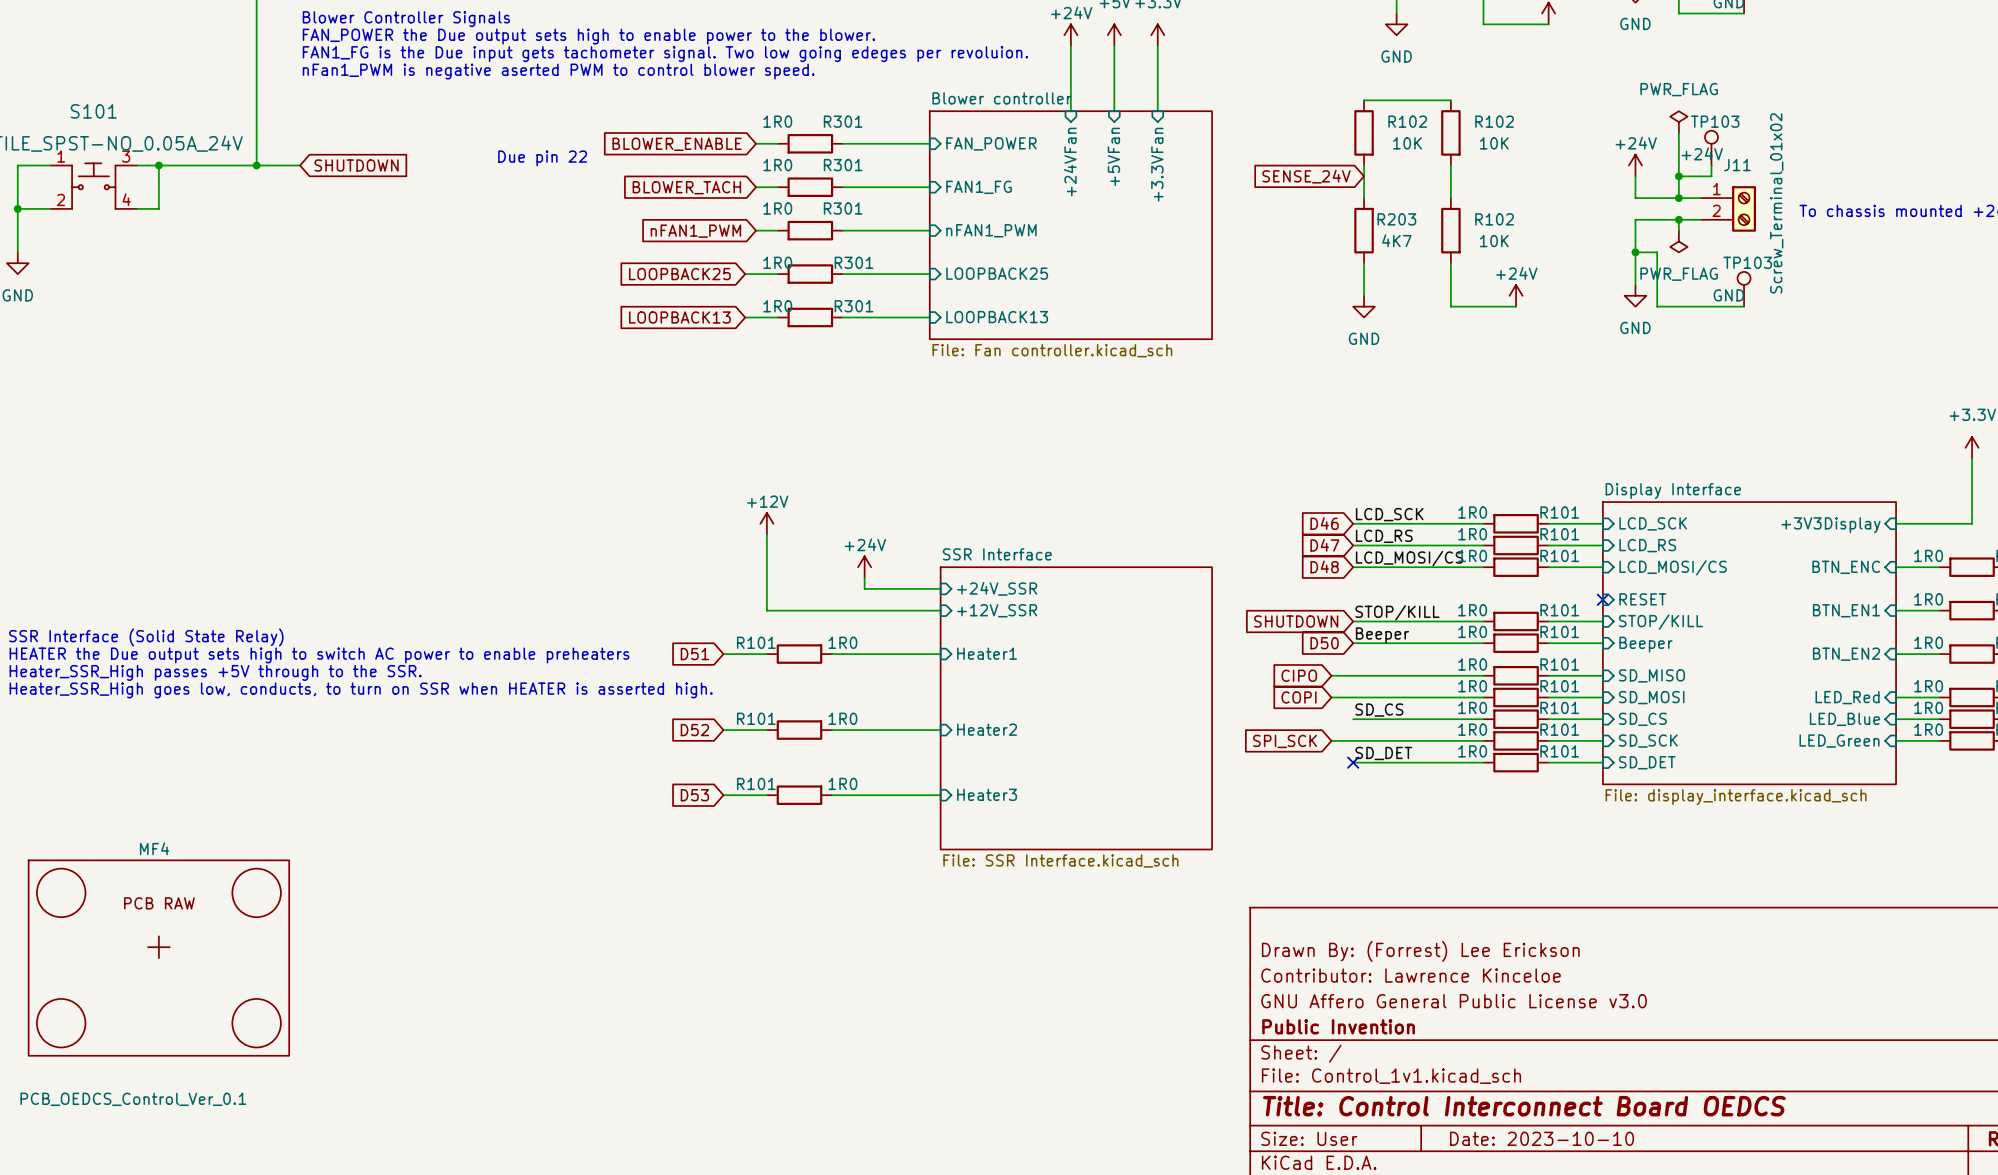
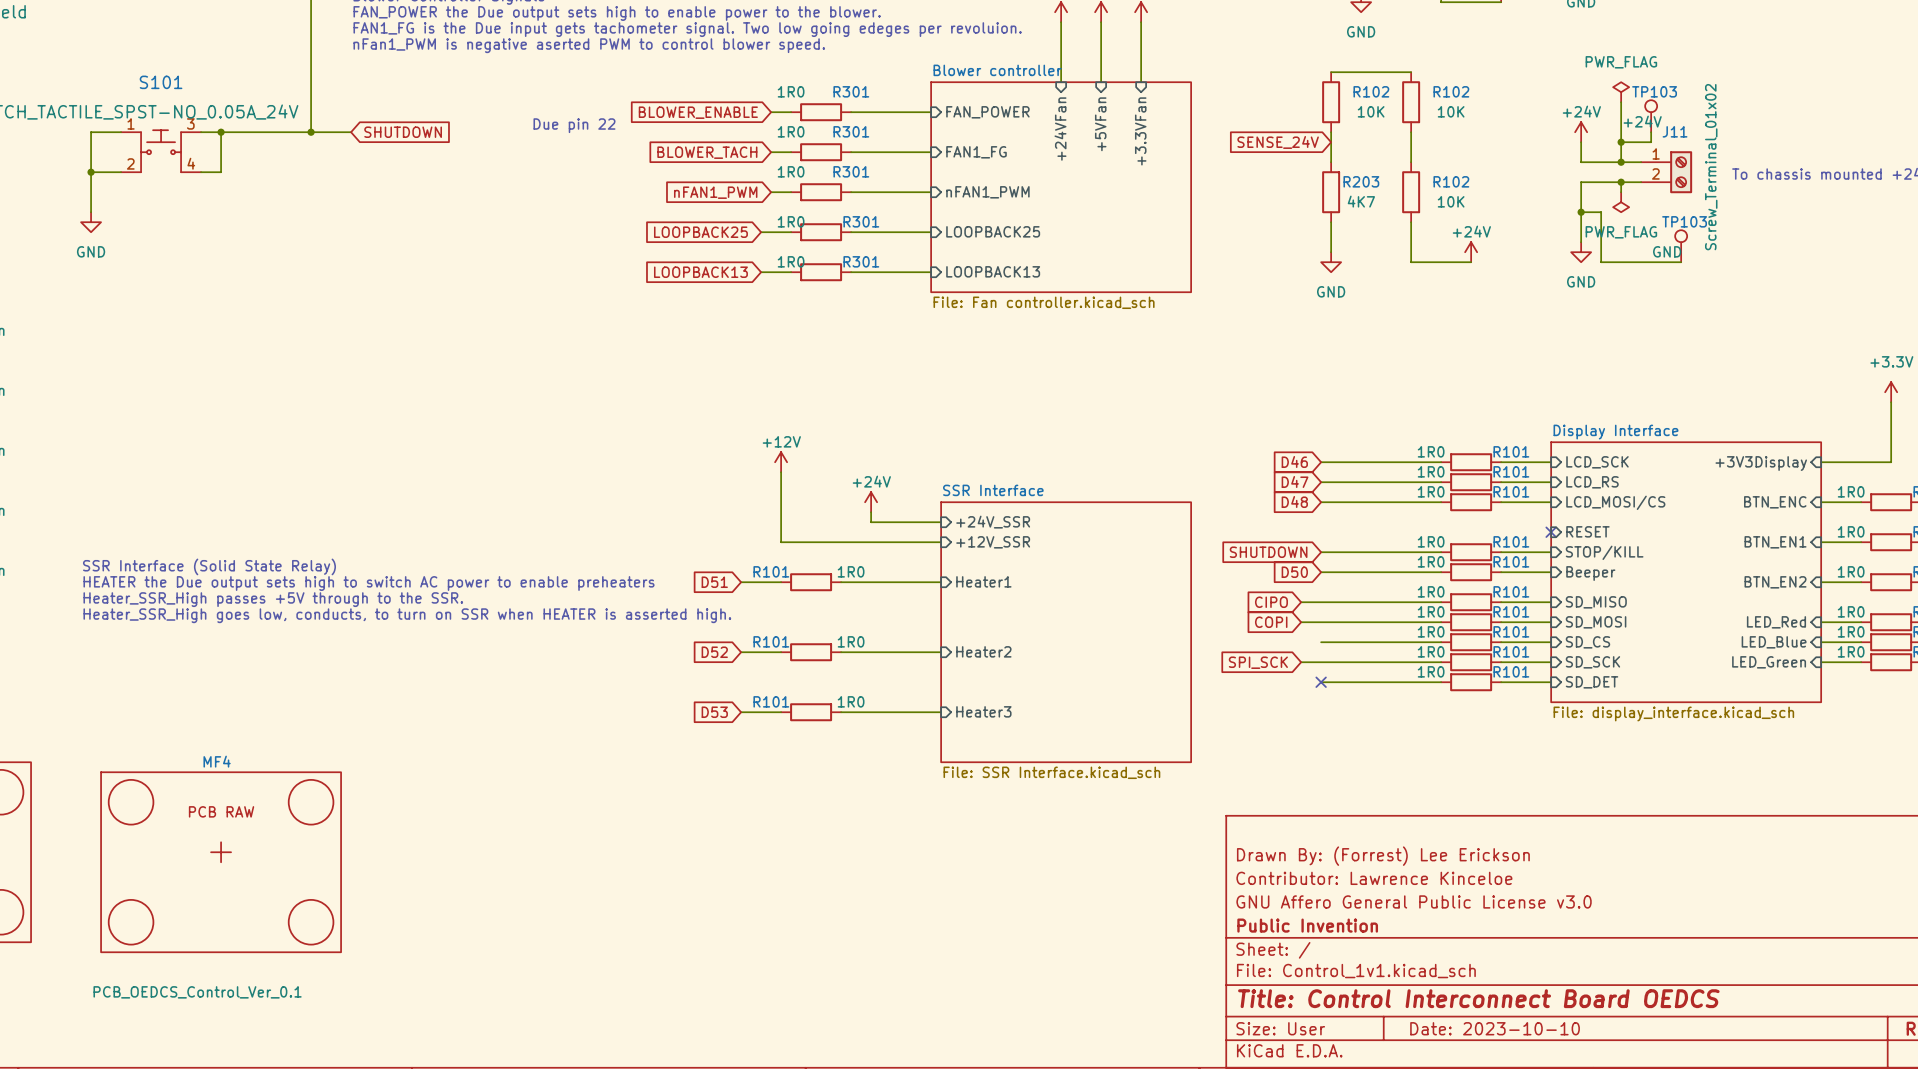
label: LCD_SCK (1389, 514) -> none
label: LCD_RS (1384, 536) -> none
label: LCD_MOSI/CS (1409, 558) -> none
label: STOP/KILL (1397, 612) -> none
label: Beeper (1382, 635) -> none
label: SD_CS (1379, 710) -> none
label: SD_DET (1383, 753) -> none

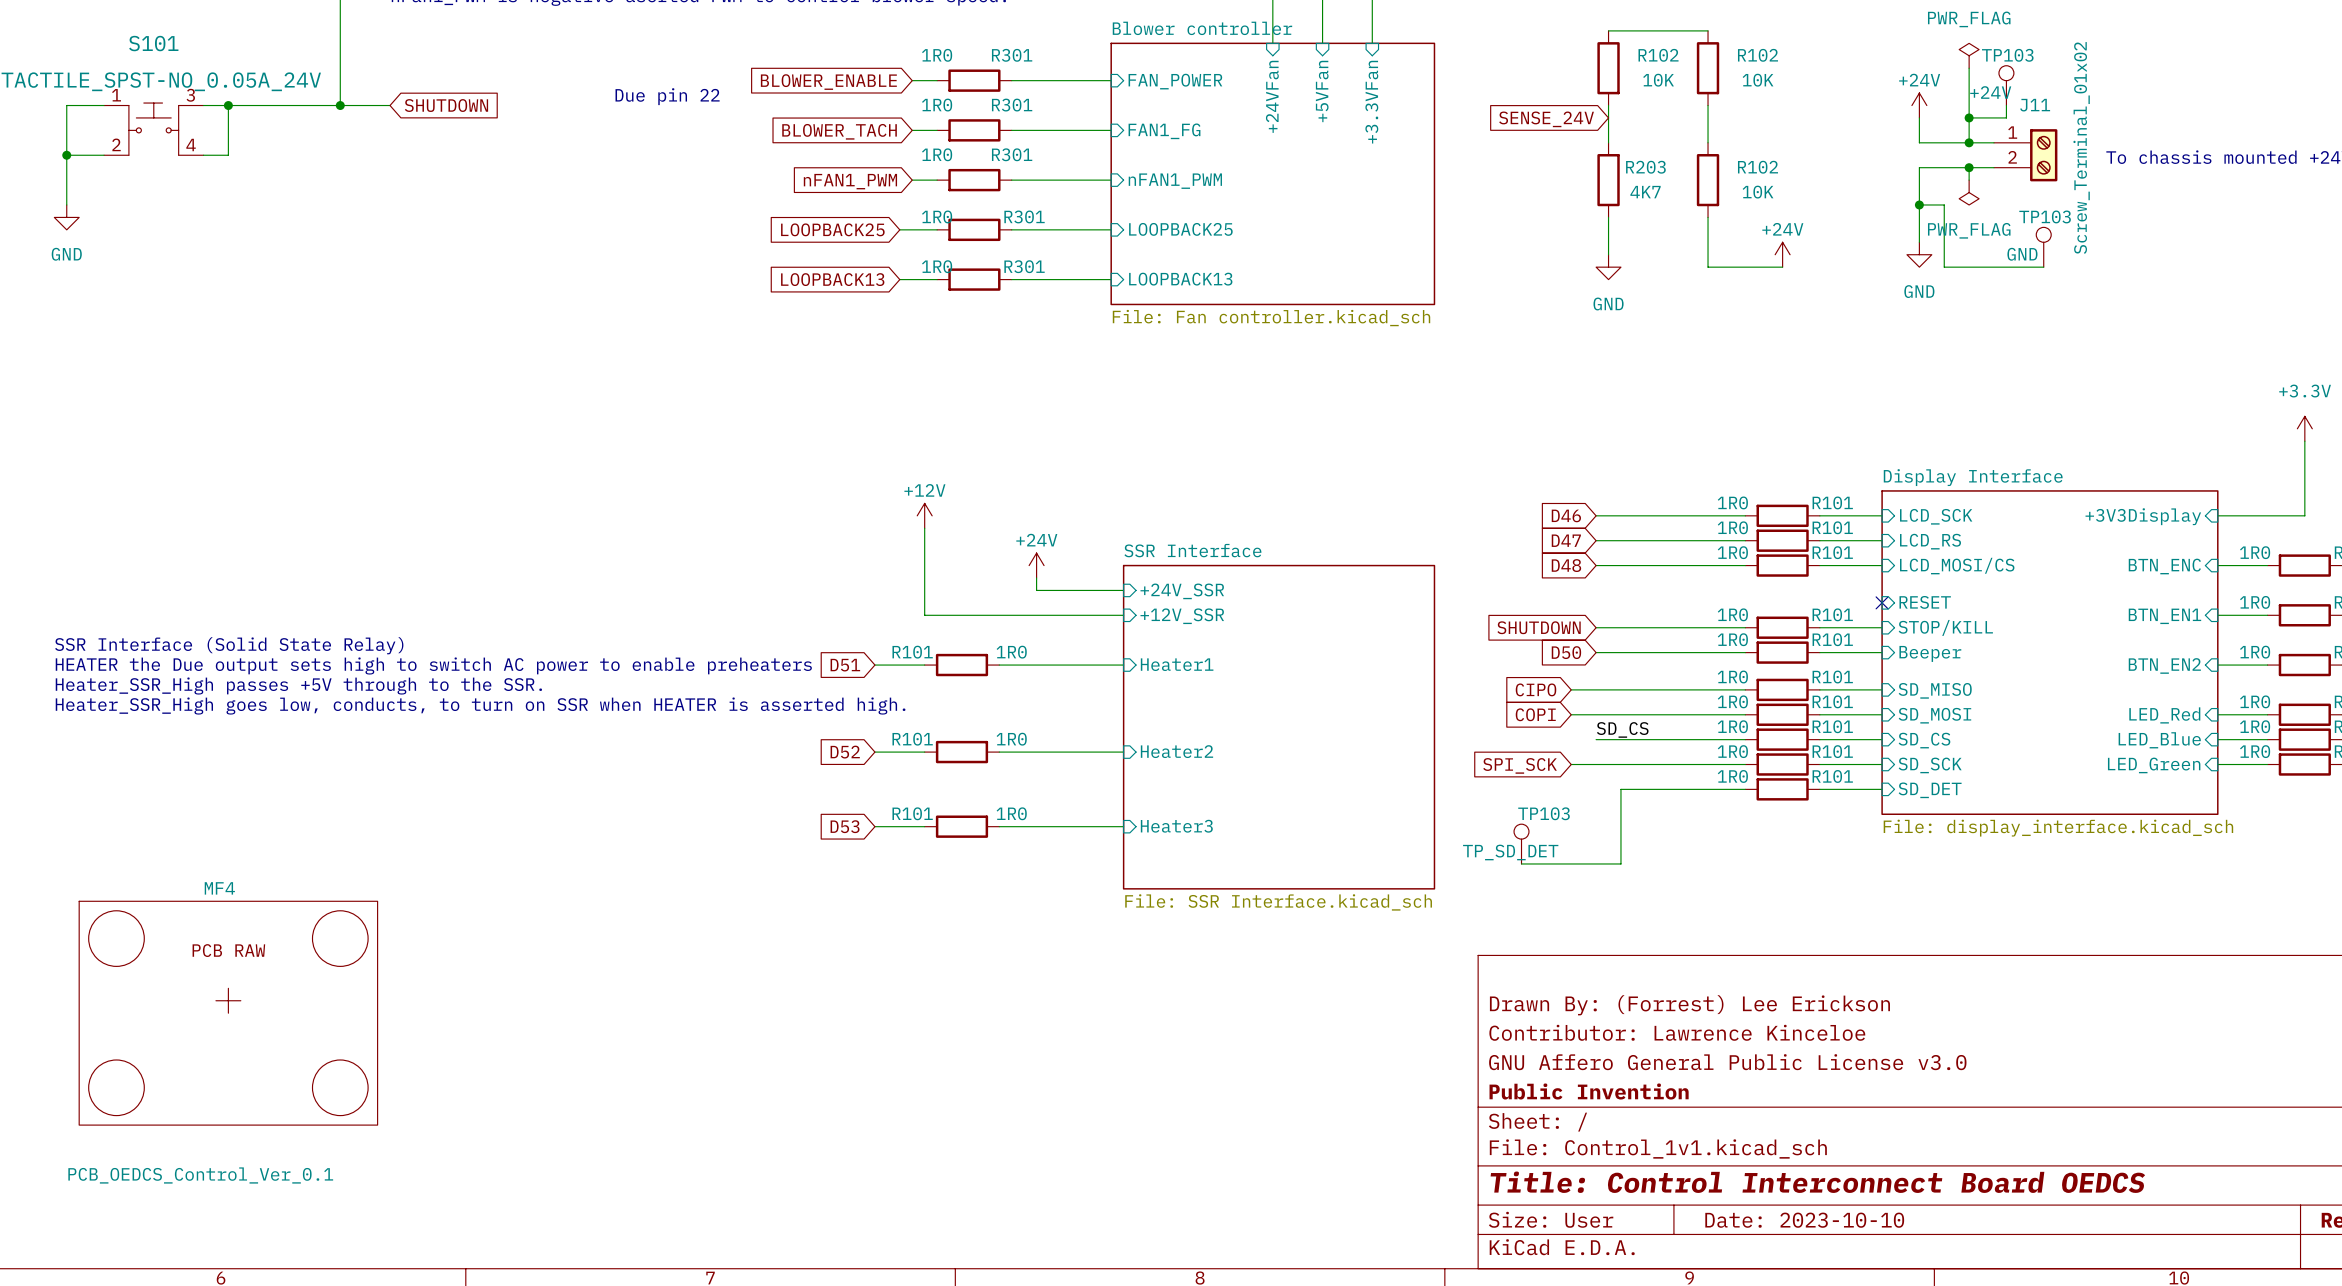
label: none -> SD_CS (1622, 729)
wire: (1321, 682) (1341, 682) -> (1521, 863) (1620, 863) (1620, 789)
no-connect mark: (1321, 682) -> none
TP103: none -> TP_SD_DET (1521, 844)

